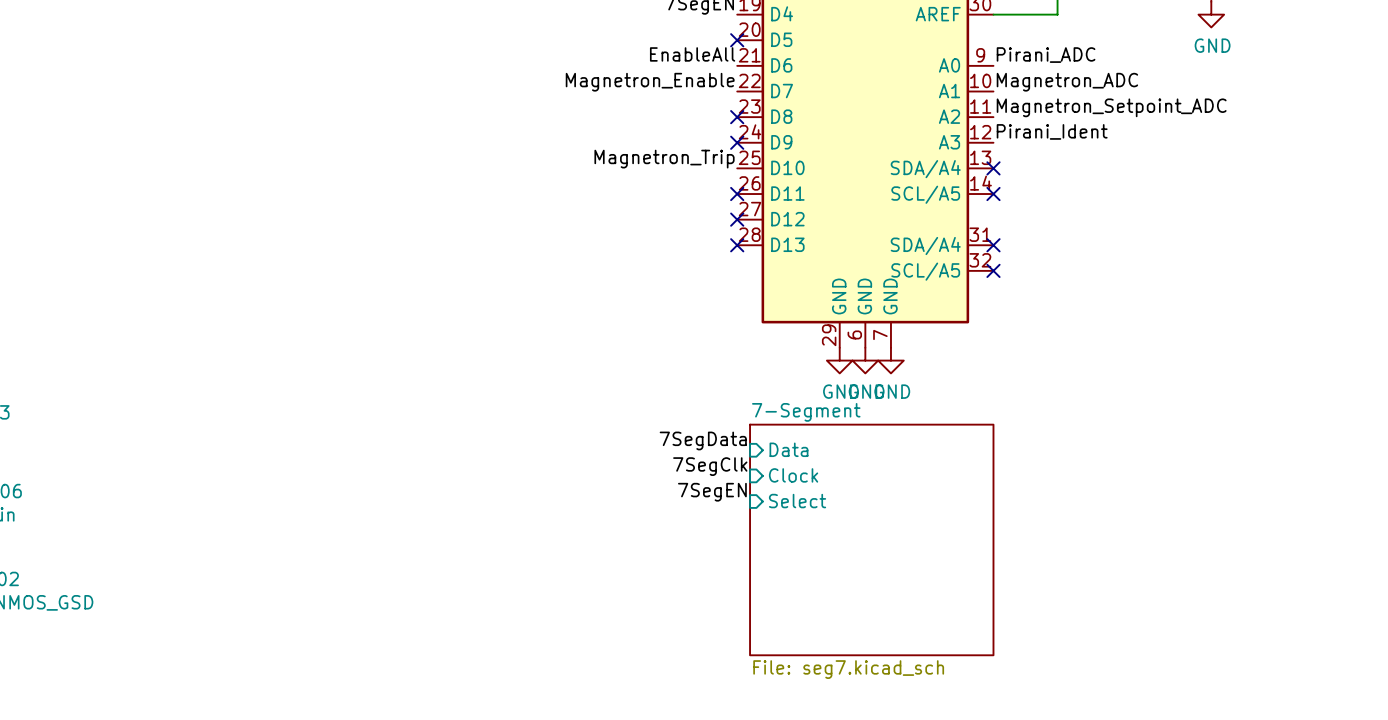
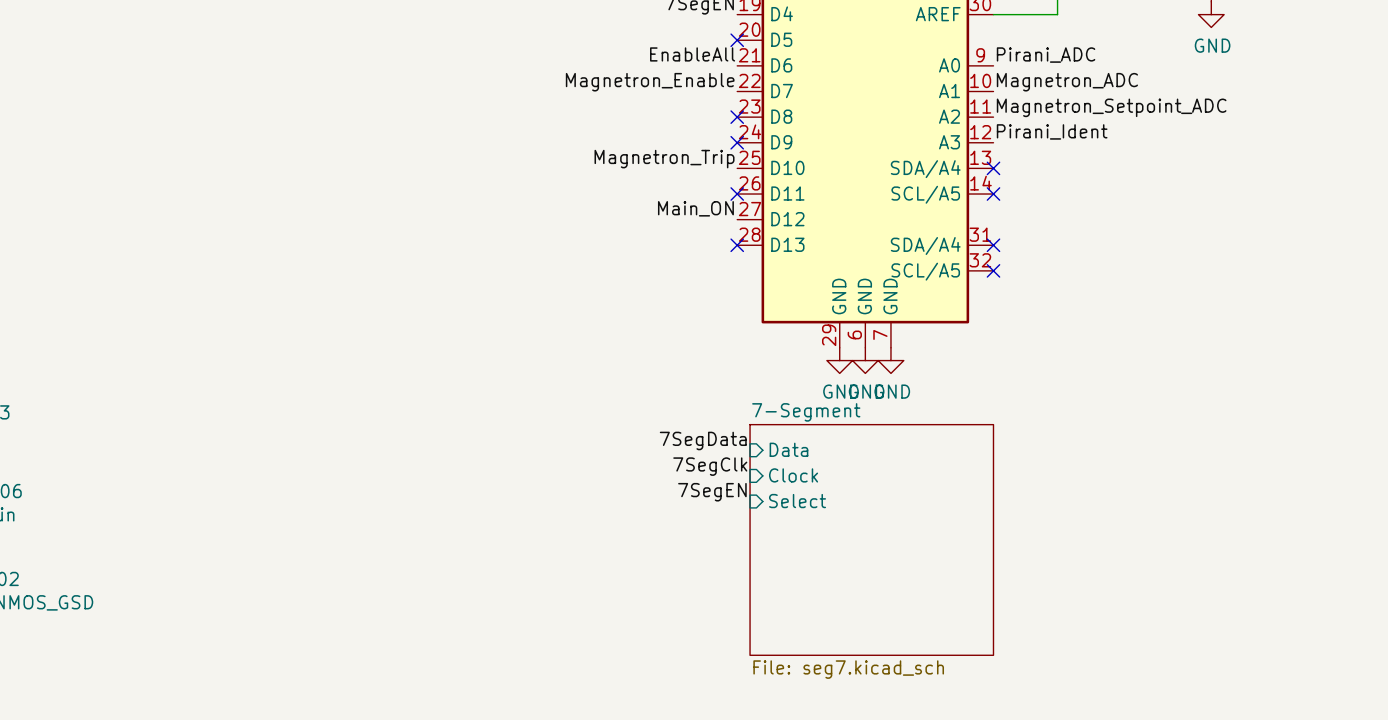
label: none -> Main_ON (695, 208)
no-connect mark: (737, 219) -> none

